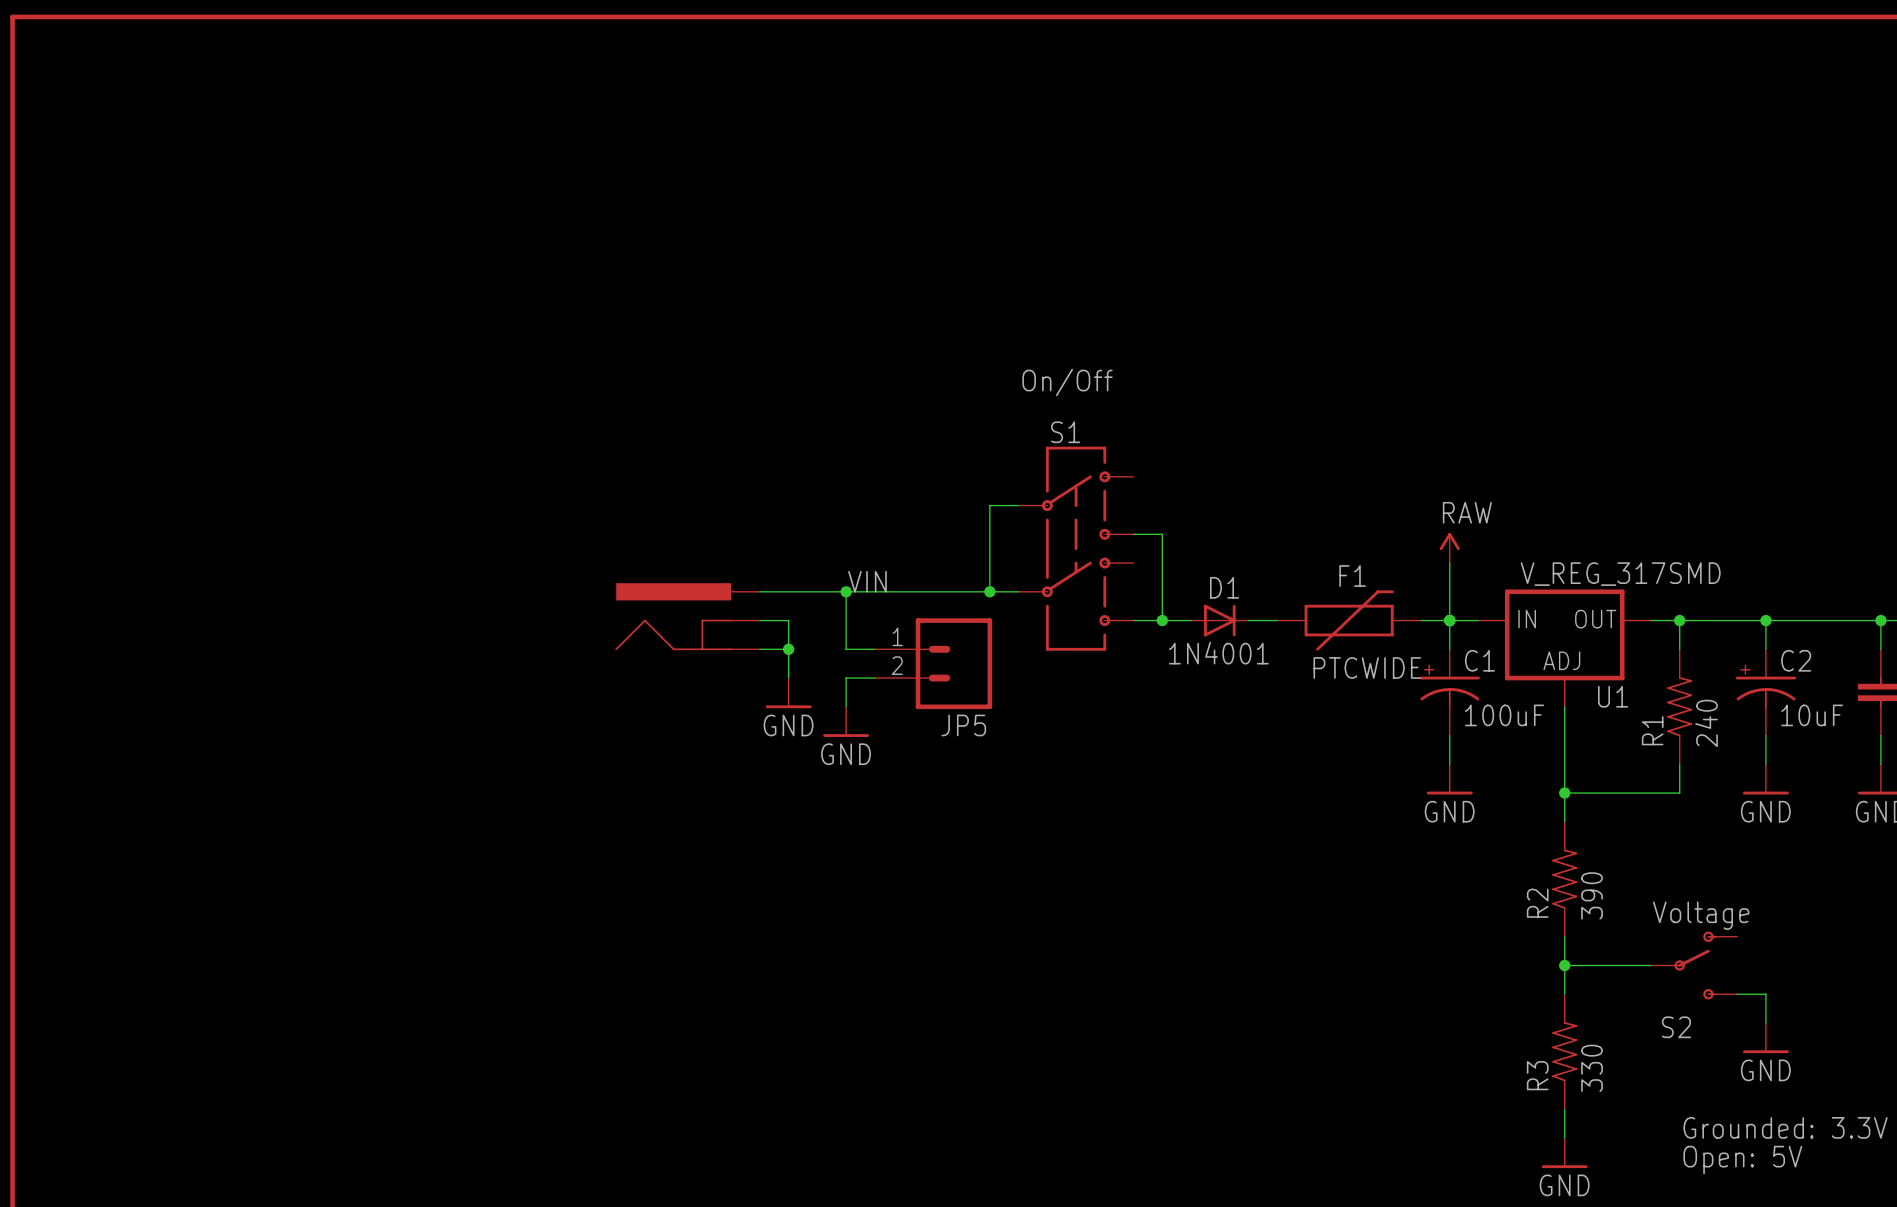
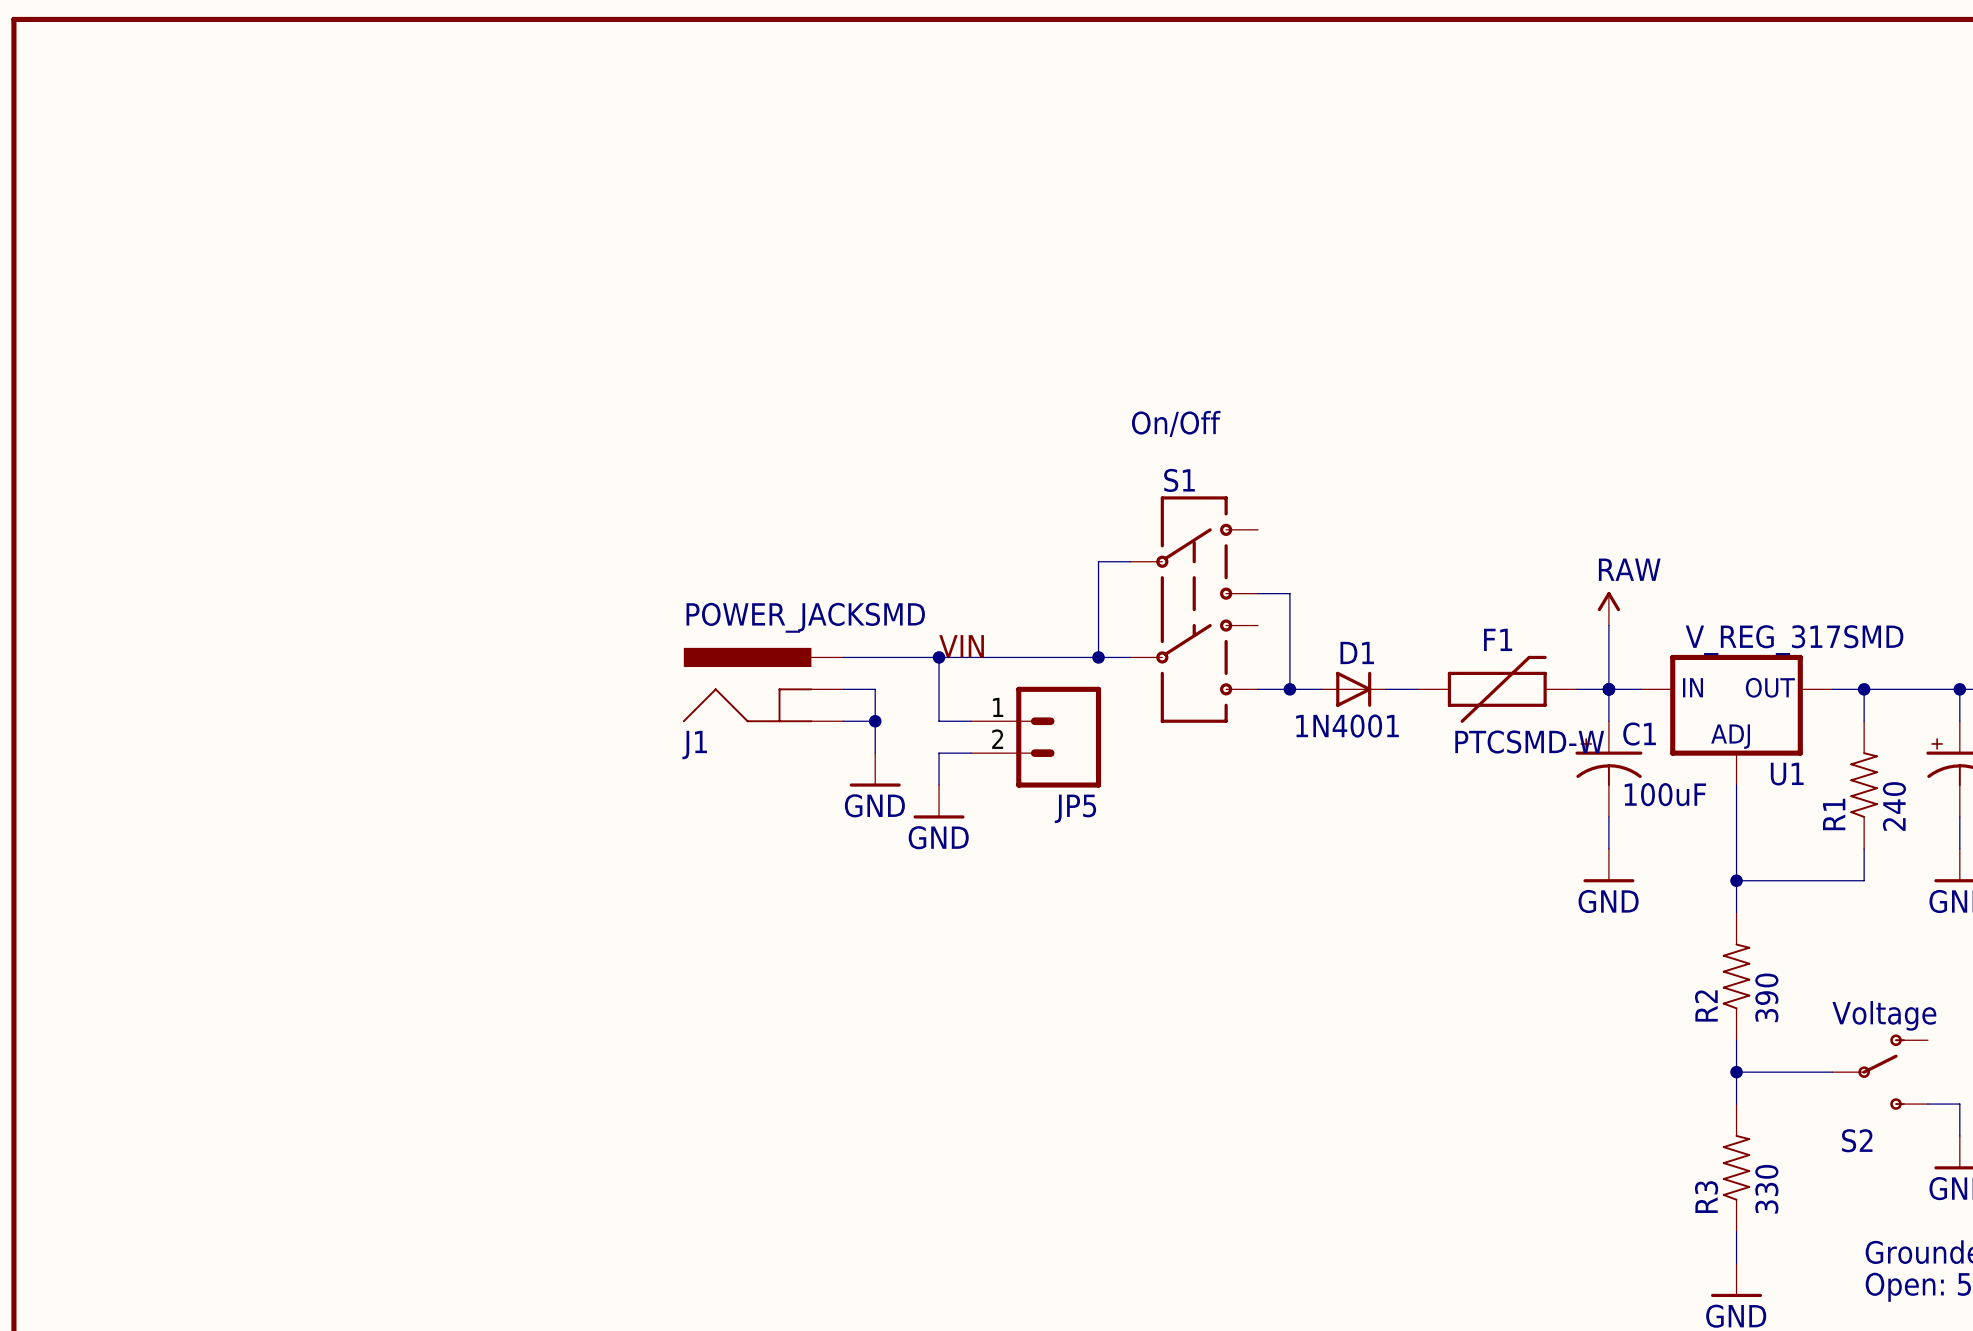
J1 value: none -> POWER_JACKSMD (805, 617)
J1 name: none -> J1 (694, 745)
F1 value: PTCWIDE (1367, 667) -> PTCSMD-W (1529, 742)

